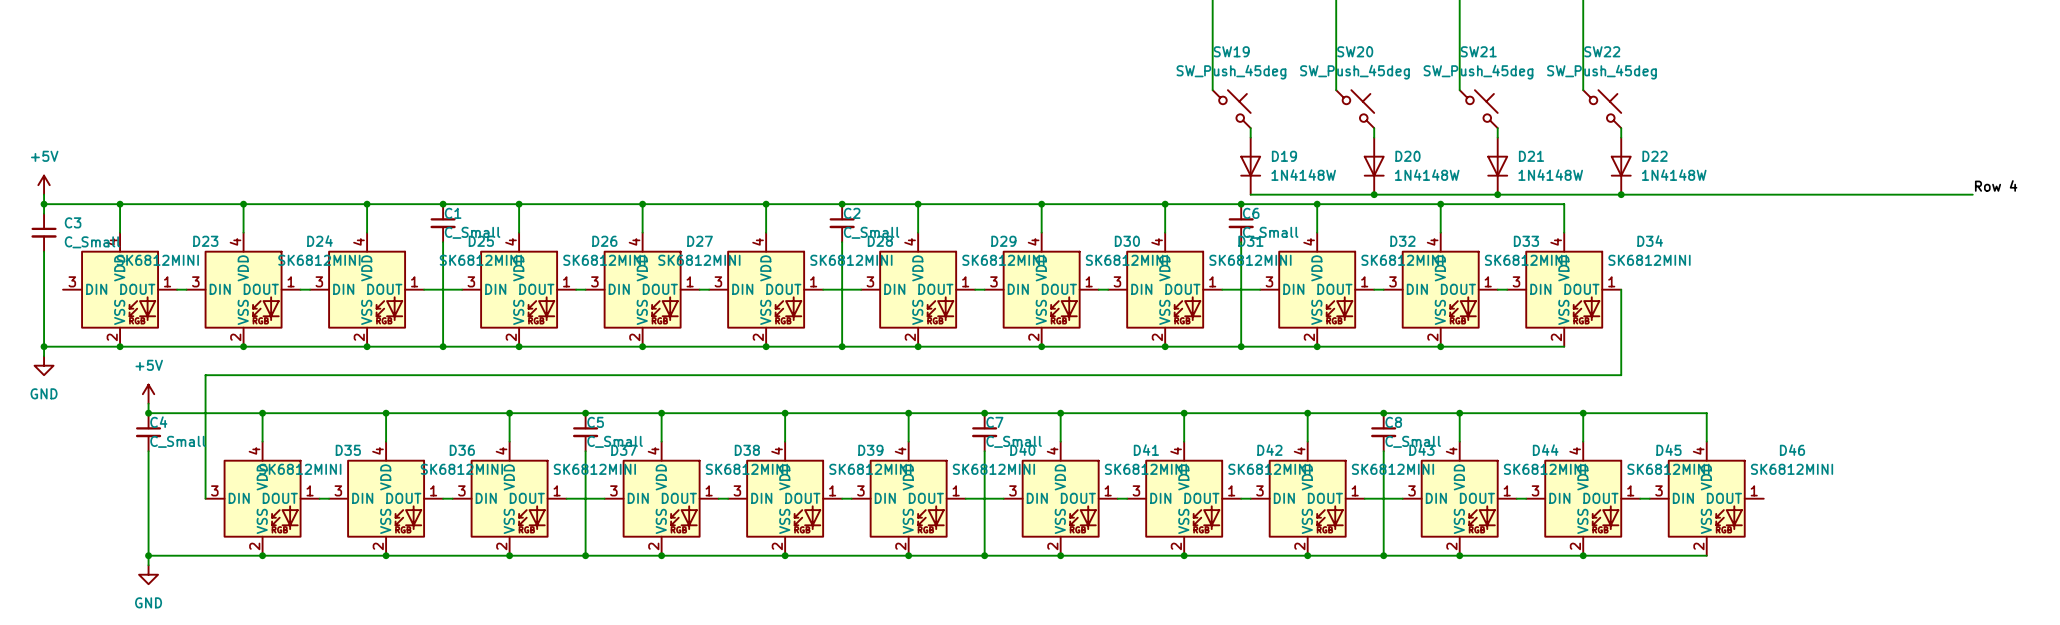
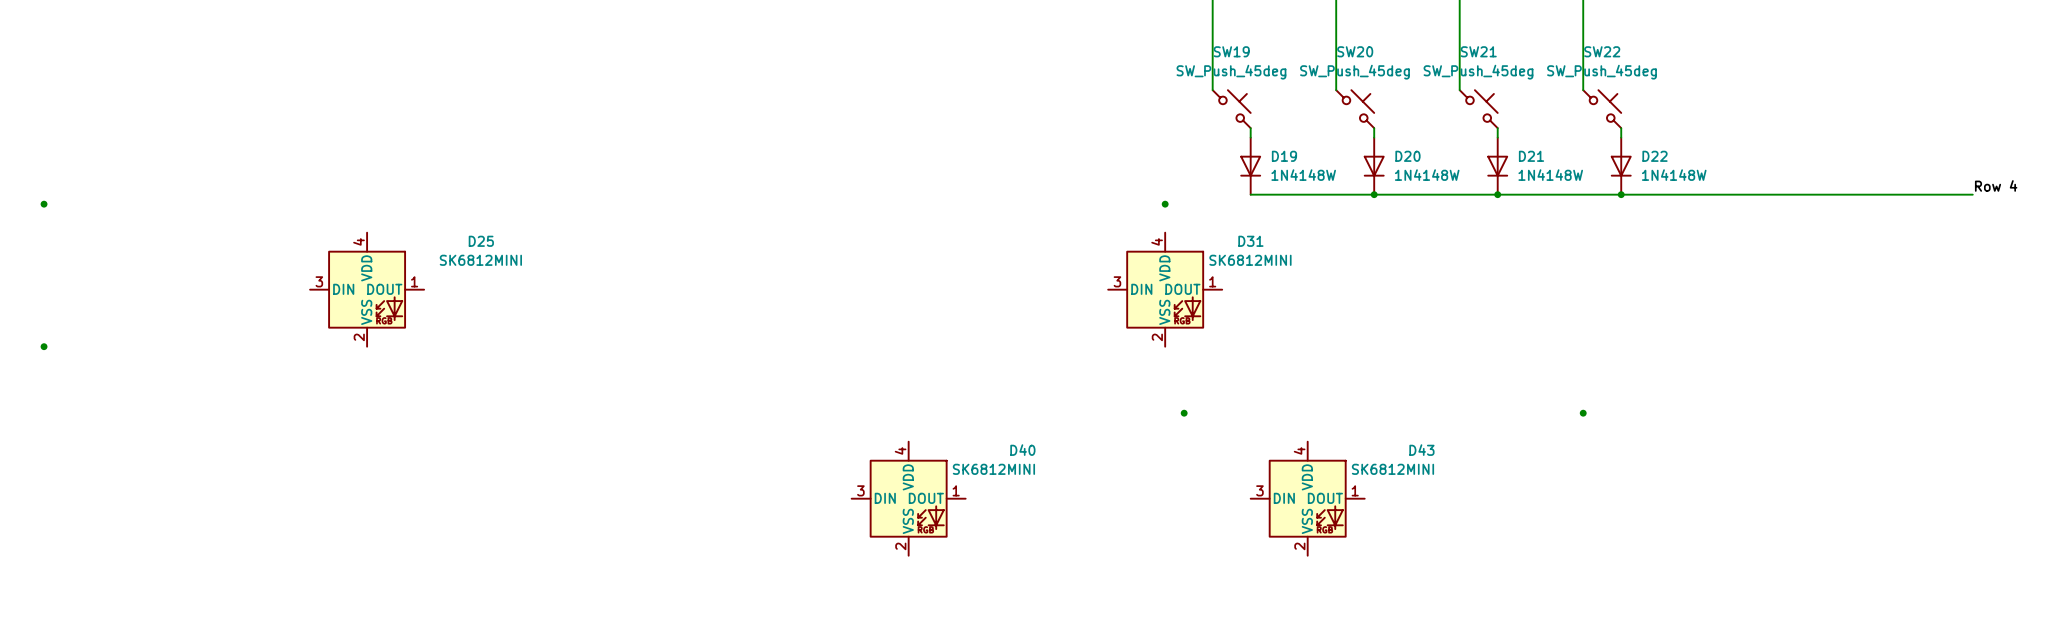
power symbol: +5V (44, 185) -> none
wire: (44, 194) (44, 213) -> none
wire: (44, 204) (1564, 204) (1564, 232) -> none
wire: (120, 204) (120, 232) -> none
junction: (120, 204) -> none
wire: (243, 204) (243, 232) -> none
junction: (243, 204) -> none
wire: (367, 204) (367, 232) -> none
junction: (367, 204) -> none
junction: (443, 204) -> none
wire: (519, 204) (519, 232) -> none
junction: (519, 204) -> none
wire: (642, 204) (642, 232) -> none
junction: (642, 204) -> none
wire: (766, 204) (766, 232) -> none
junction: (766, 204) -> none
junction: (842, 204) -> none
wire: (918, 204) (918, 232) -> none
junction: (918, 204) -> none
wire: (1041, 204) (1041, 232) -> none
junction: (1041, 204) -> none
wire: (1165, 204) (1165, 232) -> none
junction: (1241, 204) -> none
wire: (1317, 204) (1317, 232) -> none
junction: (1317, 204) -> none
wire: (1440, 204) (1440, 232) -> none
junction: (1440, 204) -> none
C1: C_Small (443, 223) -> none
C2: C_Small (842, 223) -> none
C6: C_Small (1241, 223) -> none
C3: C_Small (44, 232) -> none
wire: (443, 242) (443, 346) -> none
wire: (842, 242) (842, 346) -> none
wire: (1241, 242) (1241, 346) -> none
wire: (44, 251) (44, 356) -> none
D23: SK6812MINI (120, 289) -> none
wire: (177, 289) (186, 289) -> none
D24: SK6812MINI (243, 289) -> none
wire: (300, 289) (310, 289) -> none
wire: (424, 289) (462, 289) -> none
D26: SK6812MINI (519, 289) -> none
wire: (576, 289) (585, 289) -> none
D27: SK6812MINI (642, 289) -> none
wire: (699, 289) (709, 289) -> none
D28: SK6812MINI (766, 289) -> none
wire: (823, 289) (861, 289) -> none
D29: SK6812MINI (918, 289) -> none
wire: (975, 289) (984, 289) -> none
D30: SK6812MINI (1041, 289) -> none
wire: (1098, 289) (1108, 289) -> none
wire: (1222, 289) (1260, 289) -> none
D32: SK6812MINI (1317, 289) -> none
wire: (1374, 289) (1383, 289) -> none
D33: SK6812MINI (1440, 289) -> none
wire: (1497, 289) (1507, 289) -> none
D34: SK6812MINI (1564, 289) -> none
wire: (1621, 289) (1621, 375) (205, 375) (205, 498) -> none
wire: (44, 346) (1564, 346) -> none
junction: (120, 346) -> none
junction: (243, 346) -> none
junction: (367, 346) -> none
junction: (443, 346) -> none
junction: (519, 346) -> none
junction: (642, 346) -> none
junction: (766, 346) -> none
junction: (842, 346) -> none
junction: (918, 346) -> none
junction: (1041, 346) -> none
junction: (1165, 346) -> none
junction: (1241, 346) -> none
junction: (1317, 346) -> none
junction: (1440, 346) -> none
power symbol: GND (44, 365) -> none
power symbol: +5V (148, 394) -> none
wire: (148, 403) (148, 413) (1706, 413) (1706, 441) -> none
junction: (148, 413) -> none
wire: (262, 413) (262, 441) -> none
junction: (262, 413) -> none
wire: (386, 413) (386, 441) -> none
junction: (386, 413) -> none
wire: (509, 413) (509, 441) -> none
junction: (509, 413) -> none
junction: (585, 413) -> none
wire: (661, 413) (661, 441) -> none
junction: (661, 413) -> none
wire: (785, 413) (785, 441) -> none
junction: (785, 413) -> none
wire: (908, 413) (908, 441) -> none
junction: (908, 413) -> none
junction: (984, 413) -> none
wire: (1060, 413) (1060, 441) -> none
junction: (1060, 413) -> none
wire: (1184, 413) (1184, 441) -> none
wire: (1307, 413) (1307, 441) -> none
junction: (1307, 413) -> none
junction: (1383, 413) -> none
wire: (1459, 413) (1459, 441) -> none
junction: (1459, 413) -> none
wire: (1583, 413) (1583, 441) -> none
C4: C_Small (148, 432) -> none
C5: C_Small (585, 432) -> none
C7: C_Small (984, 432) -> none
C8: C_Small (1383, 432) -> none
wire: (148, 451) (148, 565) -> none
wire: (585, 451) (585, 555) -> none
wire: (984, 451) (984, 555) -> none
wire: (1383, 451) (1383, 555) -> none
D35: SK6812MINI (262, 498) -> none
wire: (319, 498) (329, 498) -> none
D36: SK6812MINI (386, 498) -> none
wire: (443, 498) (452, 498) -> none
D37: SK6812MINI (509, 498) -> none
wire: (566, 498) (604, 498) -> none
D38: SK6812MINI (661, 498) -> none
wire: (718, 498) (728, 498) -> none
D39: SK6812MINI (785, 498) -> none
wire: (842, 498) (851, 498) -> none
wire: (965, 498) (1003, 498) -> none
D41: SK6812MINI (1060, 498) -> none
wire: (1117, 498) (1127, 498) -> none
D42: SK6812MINI (1184, 498) -> none
wire: (1241, 498) (1250, 498) -> none
wire: (1364, 498) (1402, 498) -> none
D44: SK6812MINI (1459, 498) -> none
wire: (1516, 498) (1526, 498) -> none
D45: SK6812MINI (1583, 498) -> none
wire: (1640, 498) (1649, 498) -> none
D46: SK6812MINI (1706, 498) -> none
wire: (148, 555) (1706, 555) -> none
junction: (148, 555) -> none
junction: (262, 555) -> none
junction: (386, 555) -> none
junction: (509, 555) -> none
junction: (585, 555) -> none
junction: (661, 555) -> none
junction: (785, 555) -> none
junction: (908, 555) -> none
junction: (984, 555) -> none
junction: (1060, 555) -> none
junction: (1184, 555) -> none
junction: (1307, 555) -> none
junction: (1383, 555) -> none
junction: (1459, 555) -> none
junction: (1583, 555) -> none
power symbol: GND (148, 574) -> none

